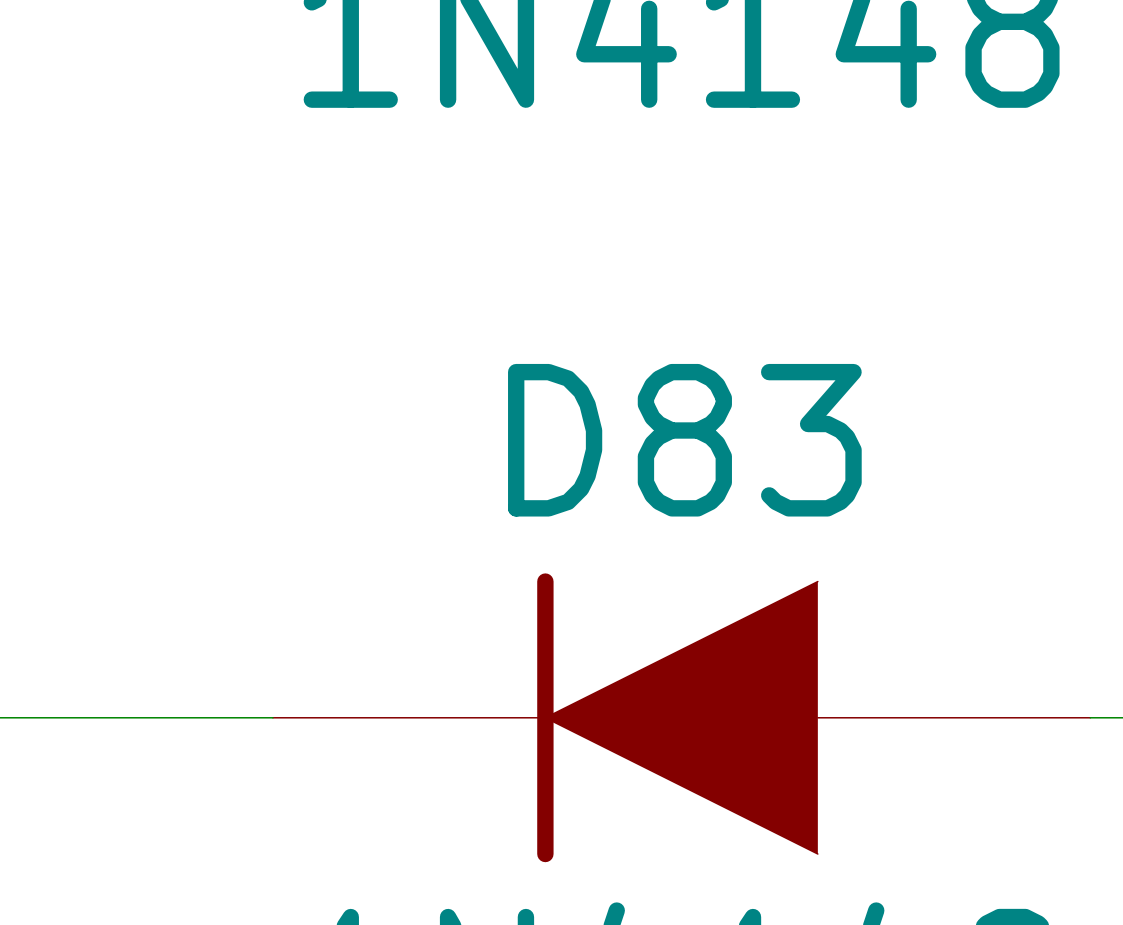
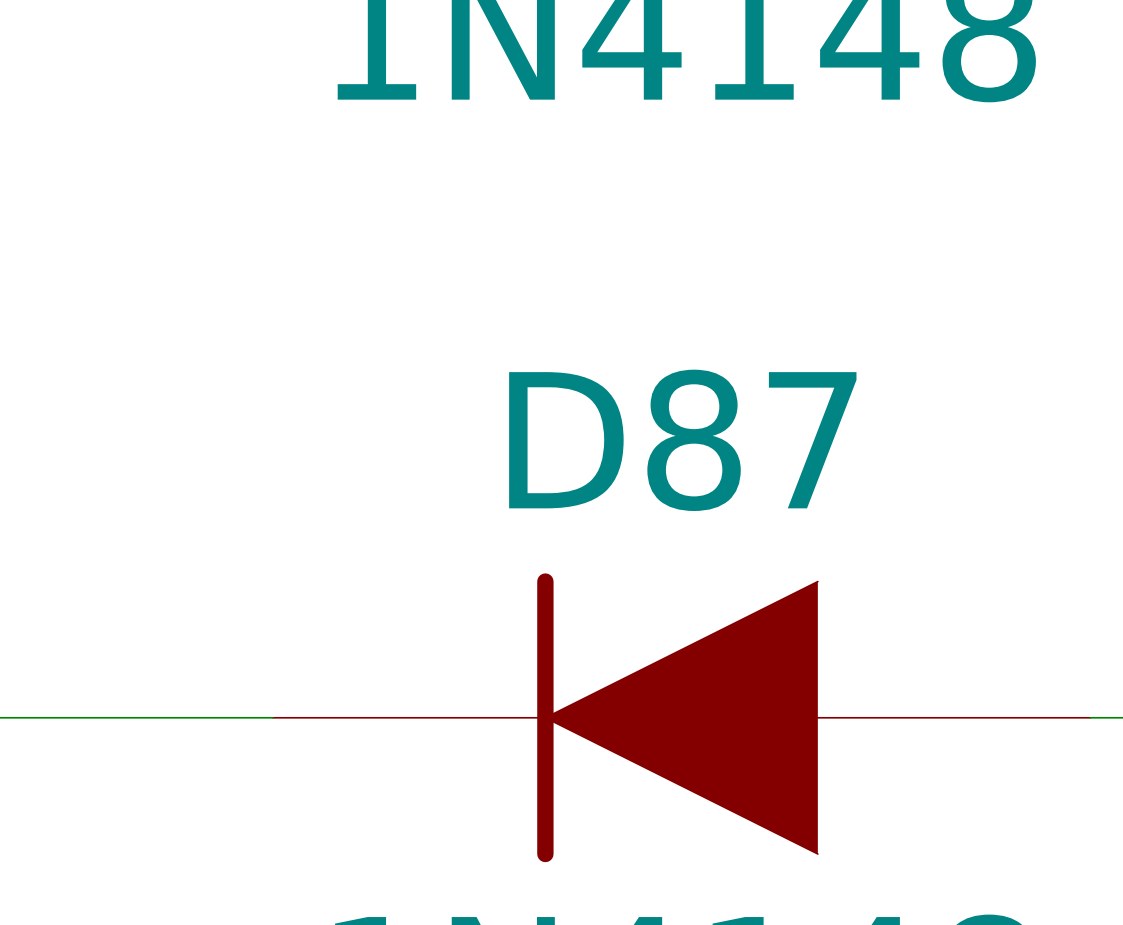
D83 name: D83 (684, 440) -> D87 (682, 440)

